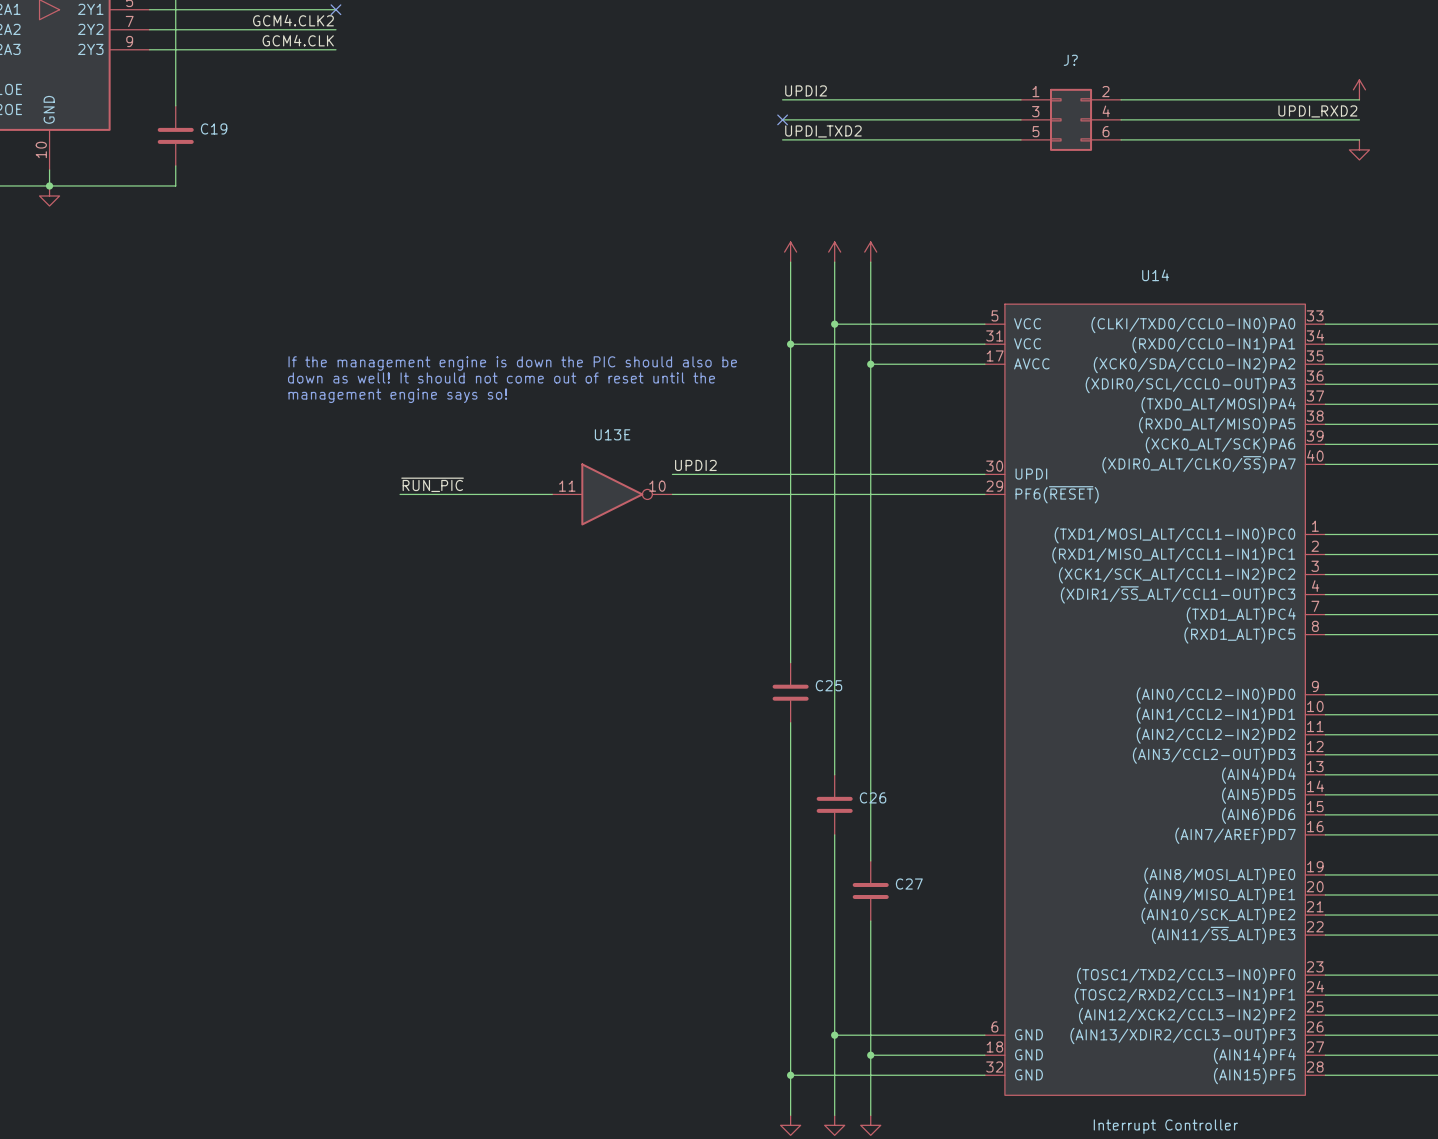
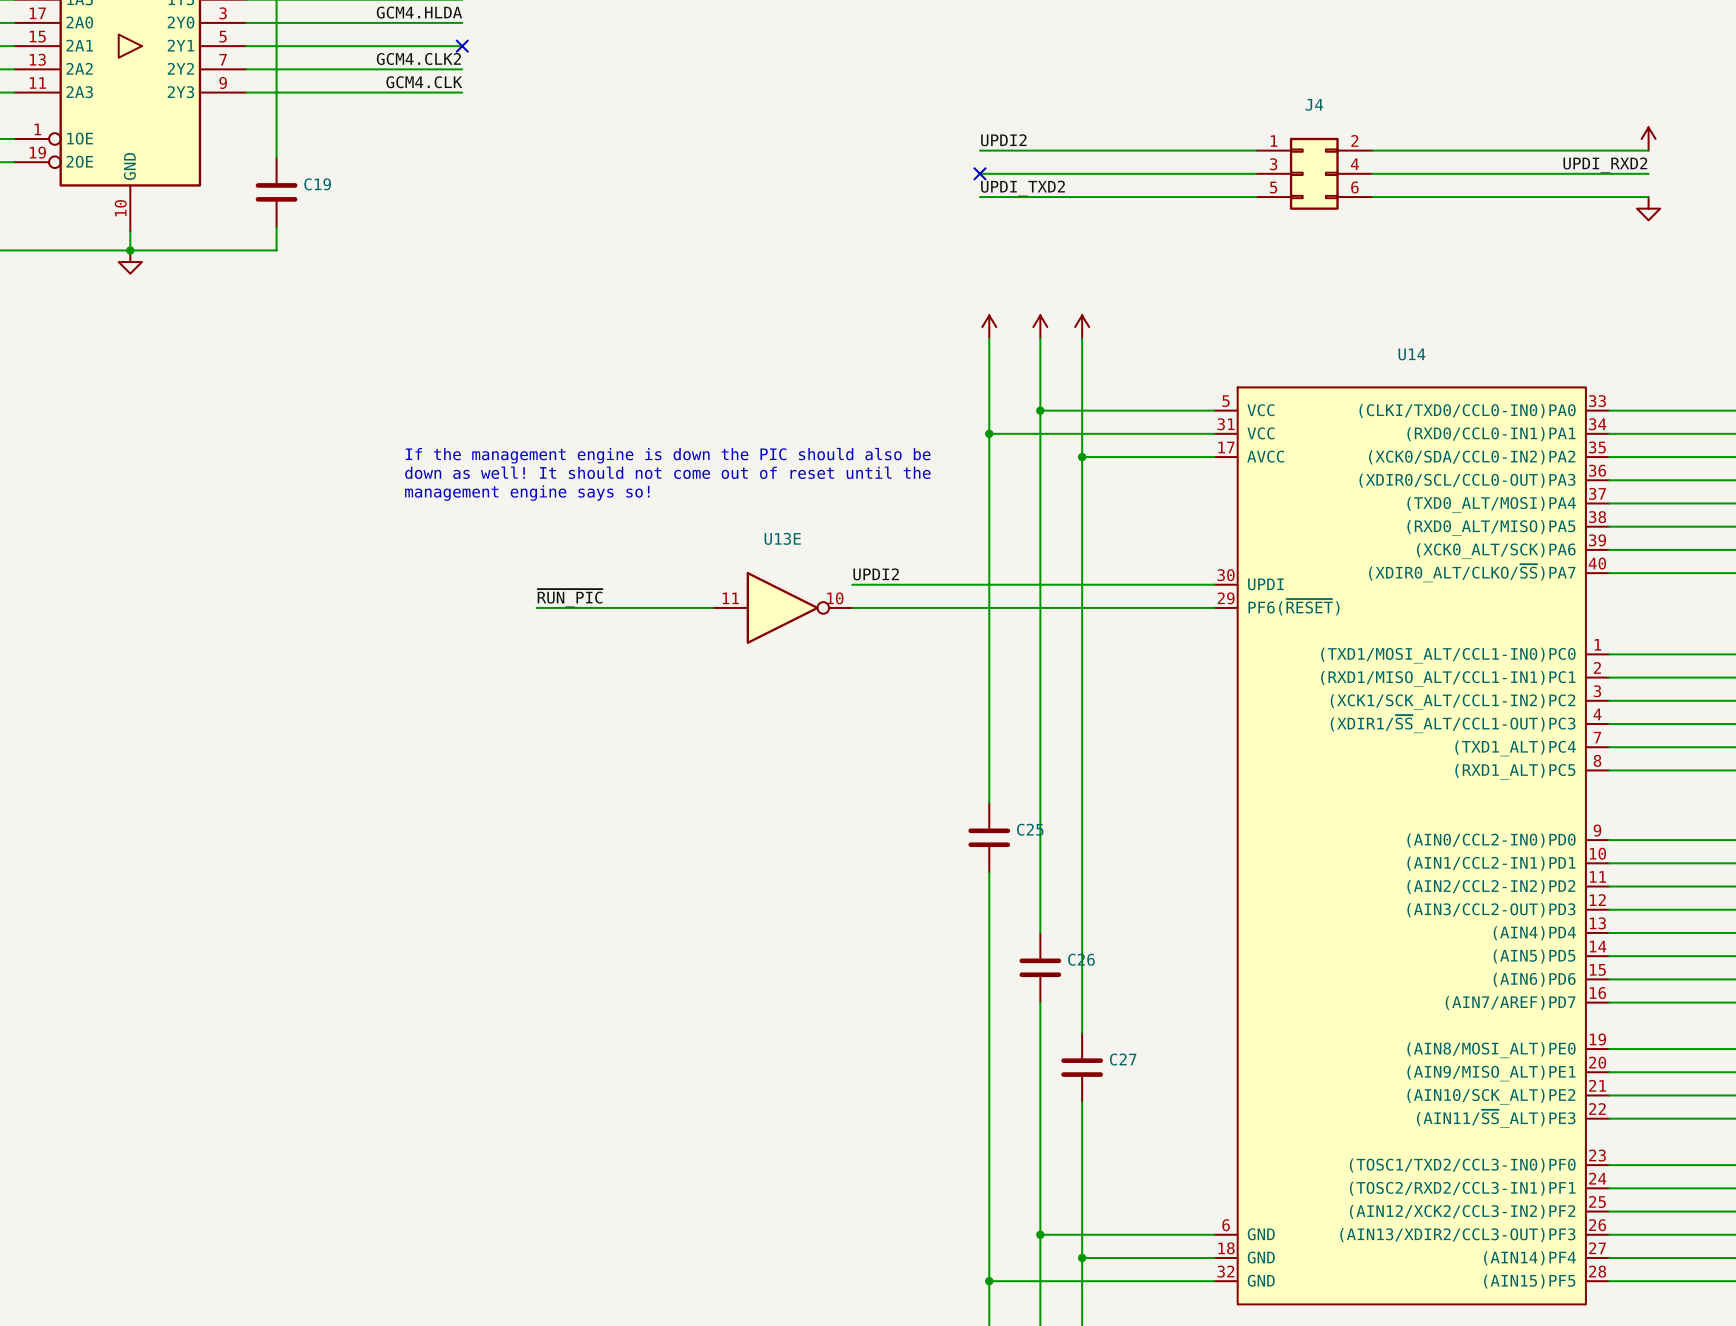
J? name: J? (1070, 60) -> J4 (1314, 104)

